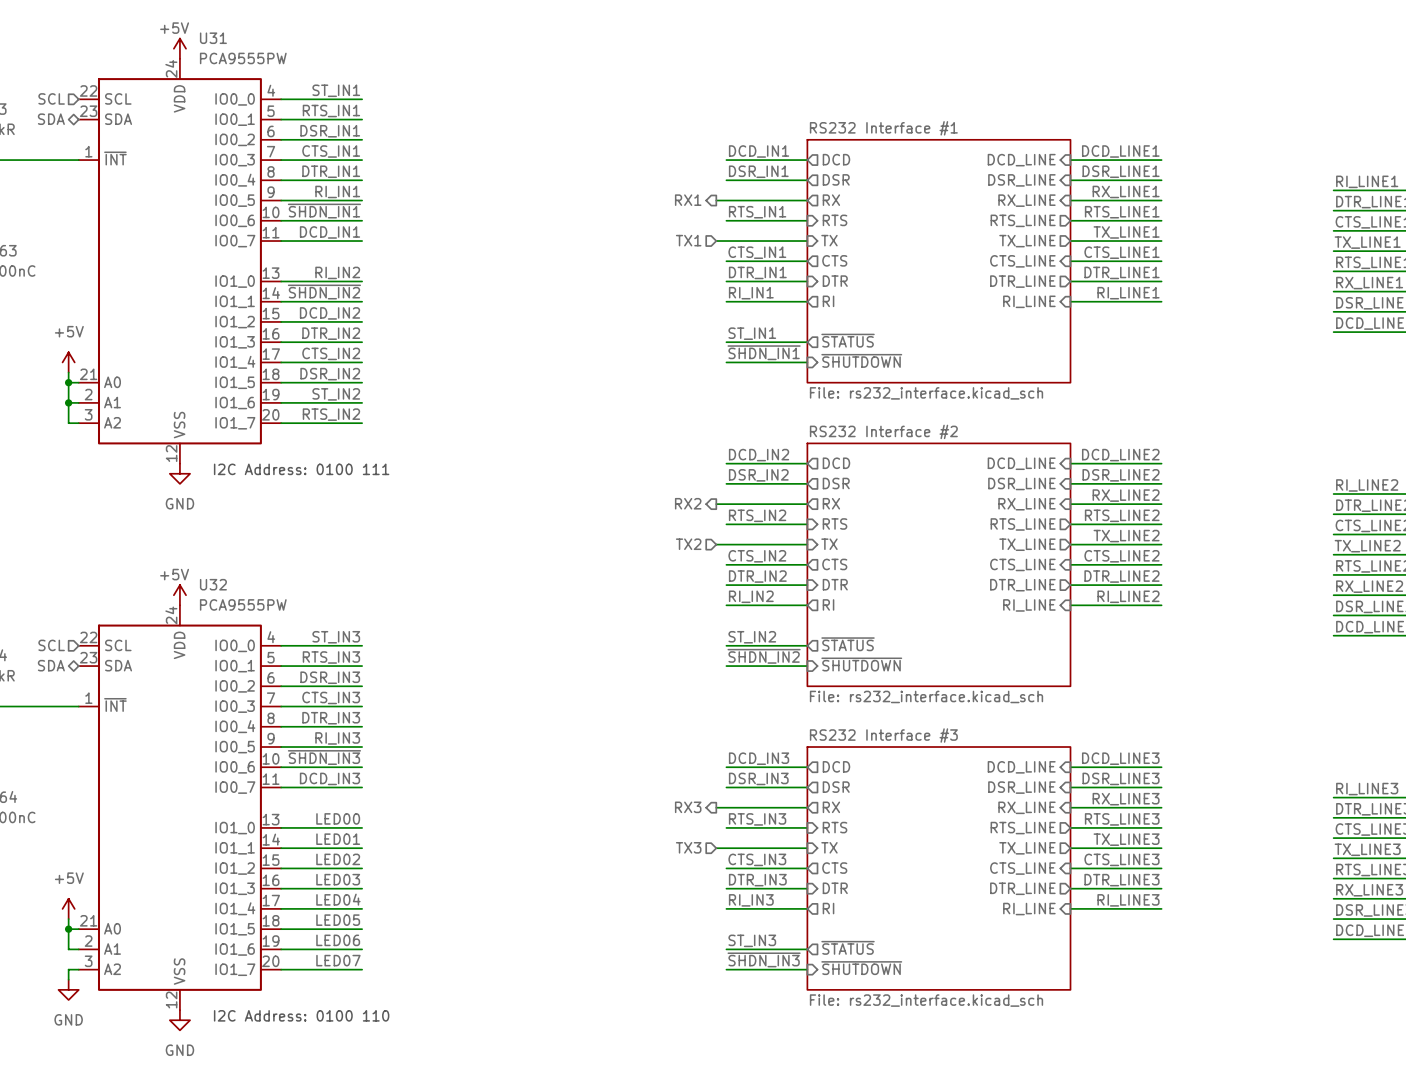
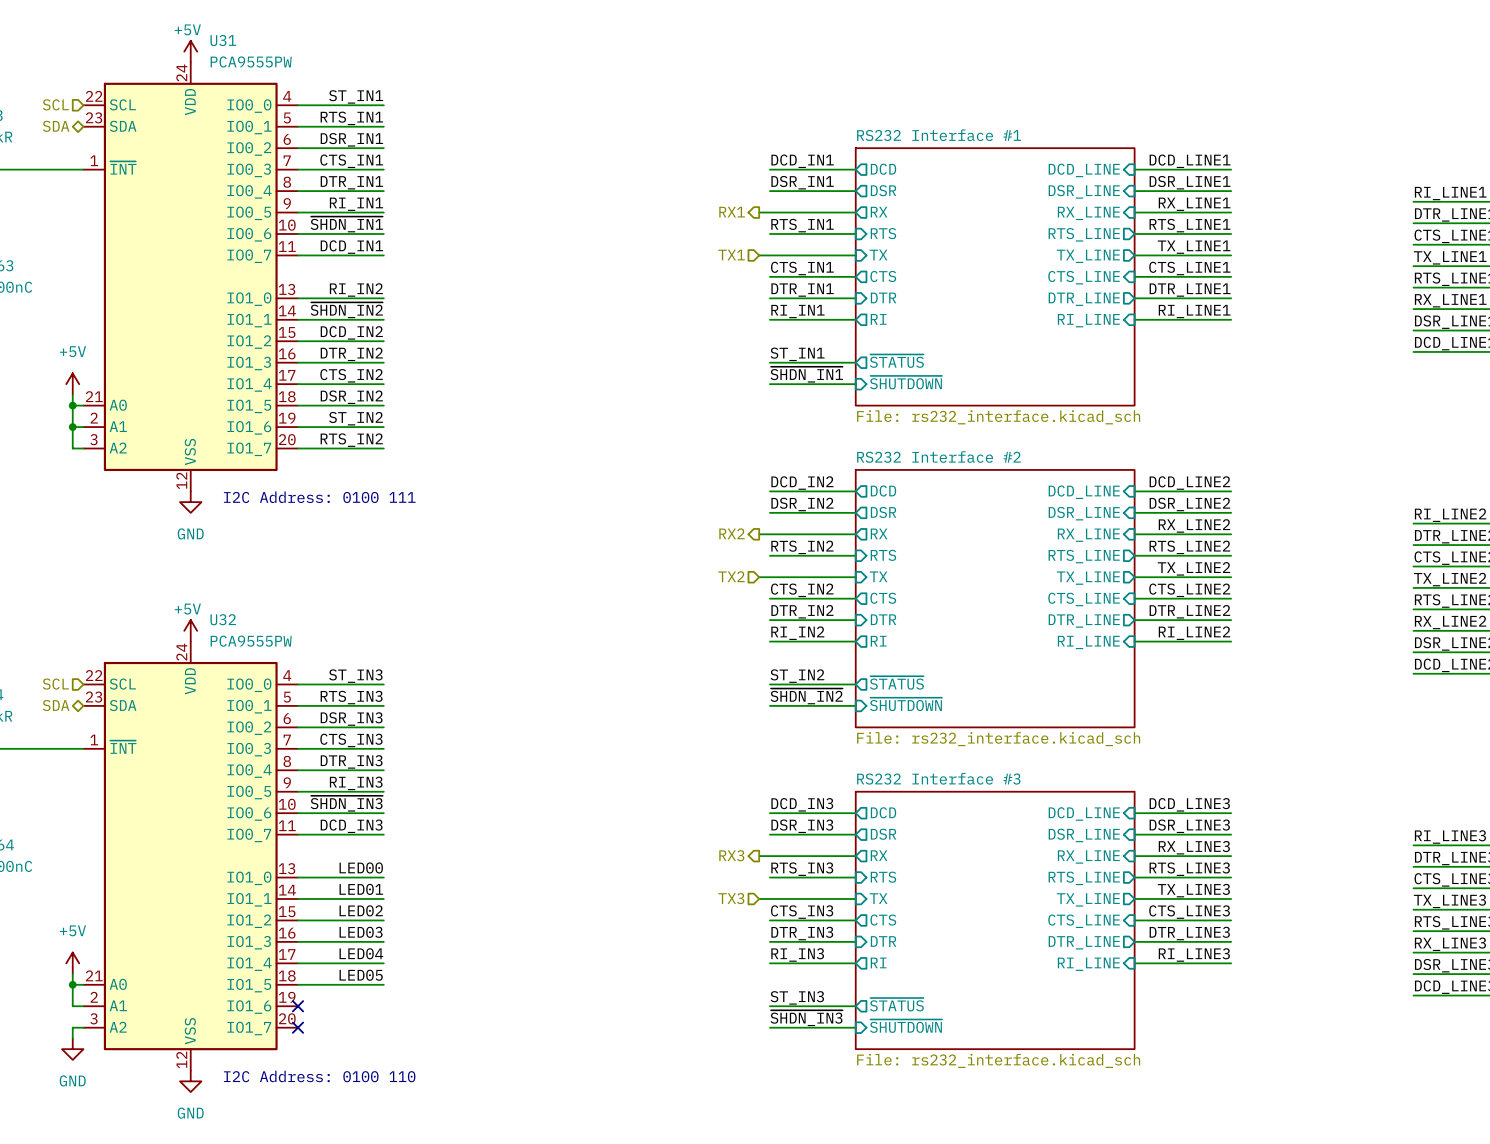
label: LED06 (338, 940) -> none
wire: (281, 949) (362, 949) -> none
no-connect mark: none -> (297, 1006)
label: LED07 (338, 960) -> none
wire: (281, 969) (362, 969) -> none
no-connect mark: none -> (297, 1027)

